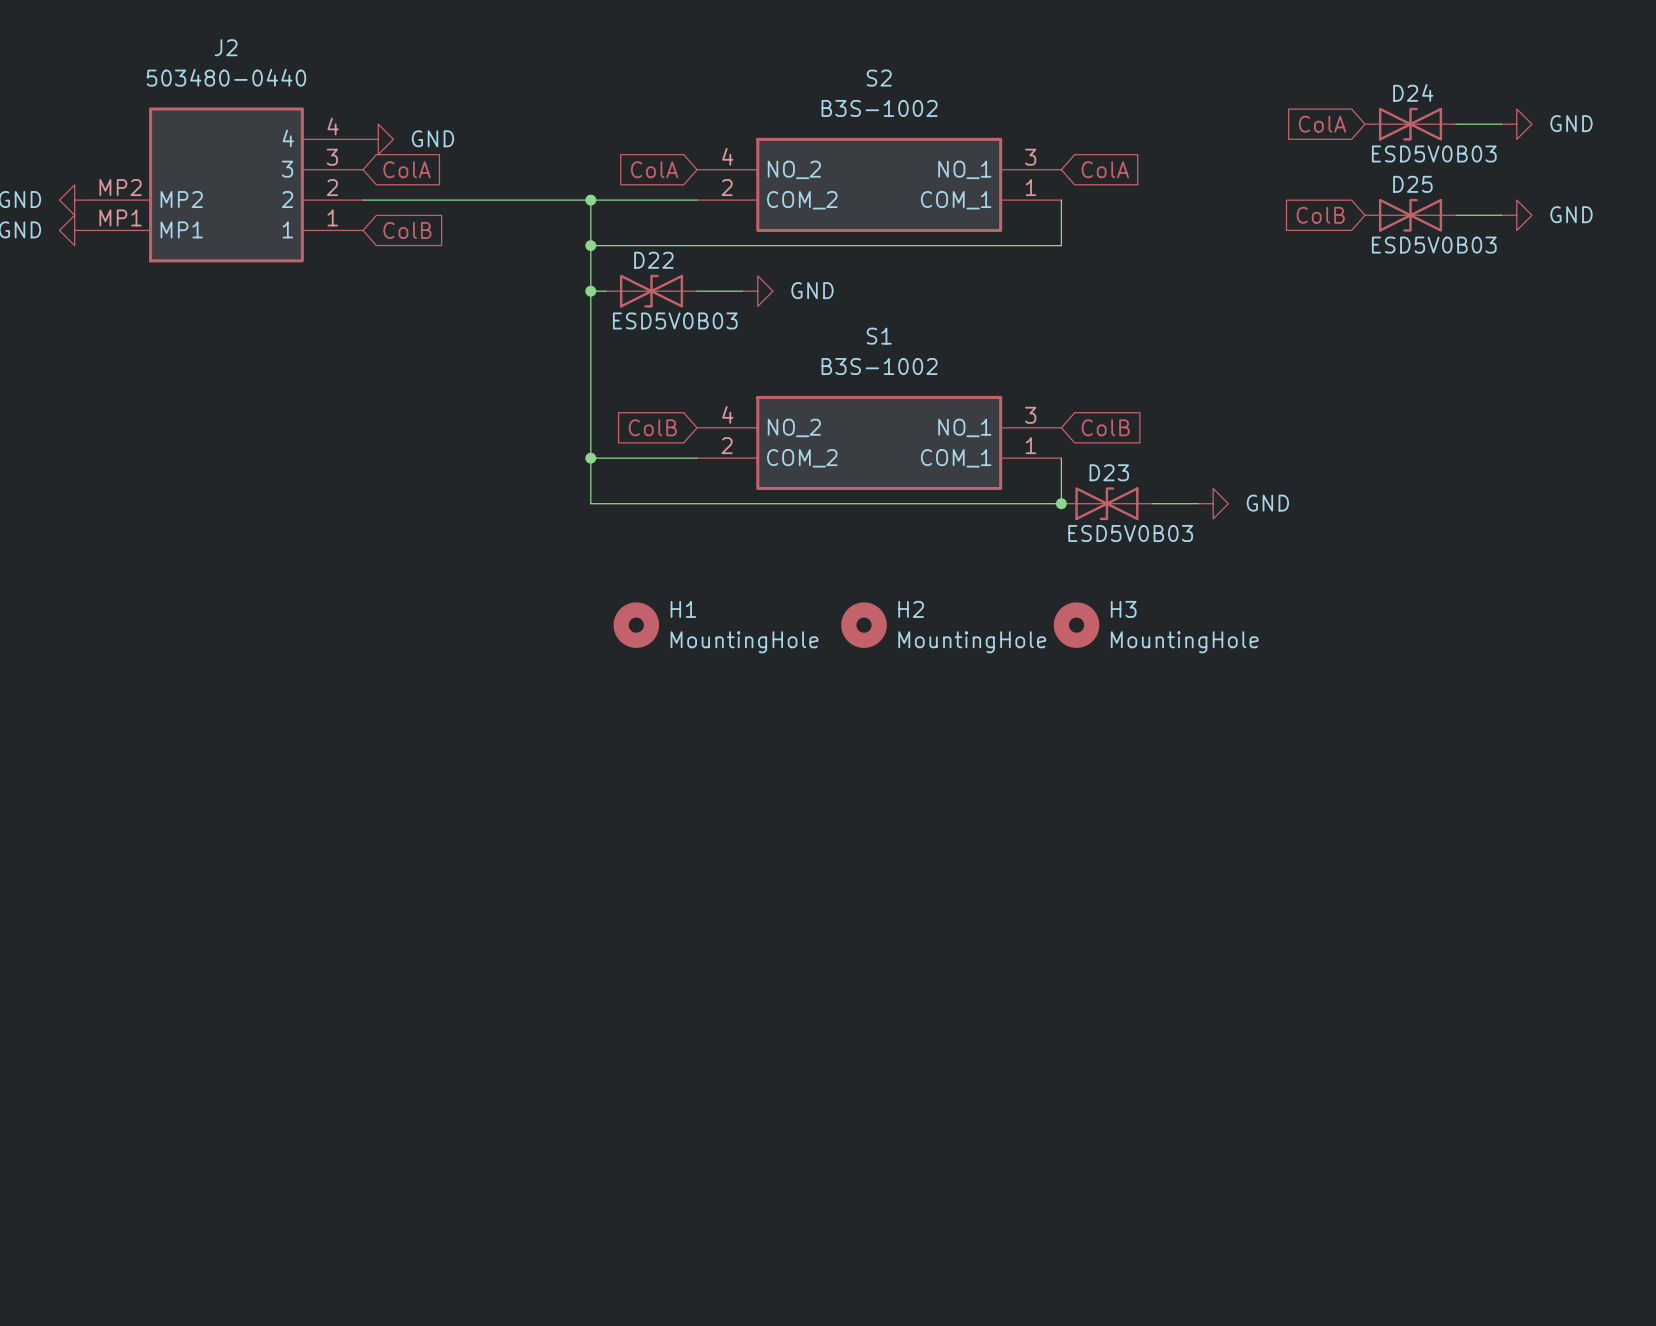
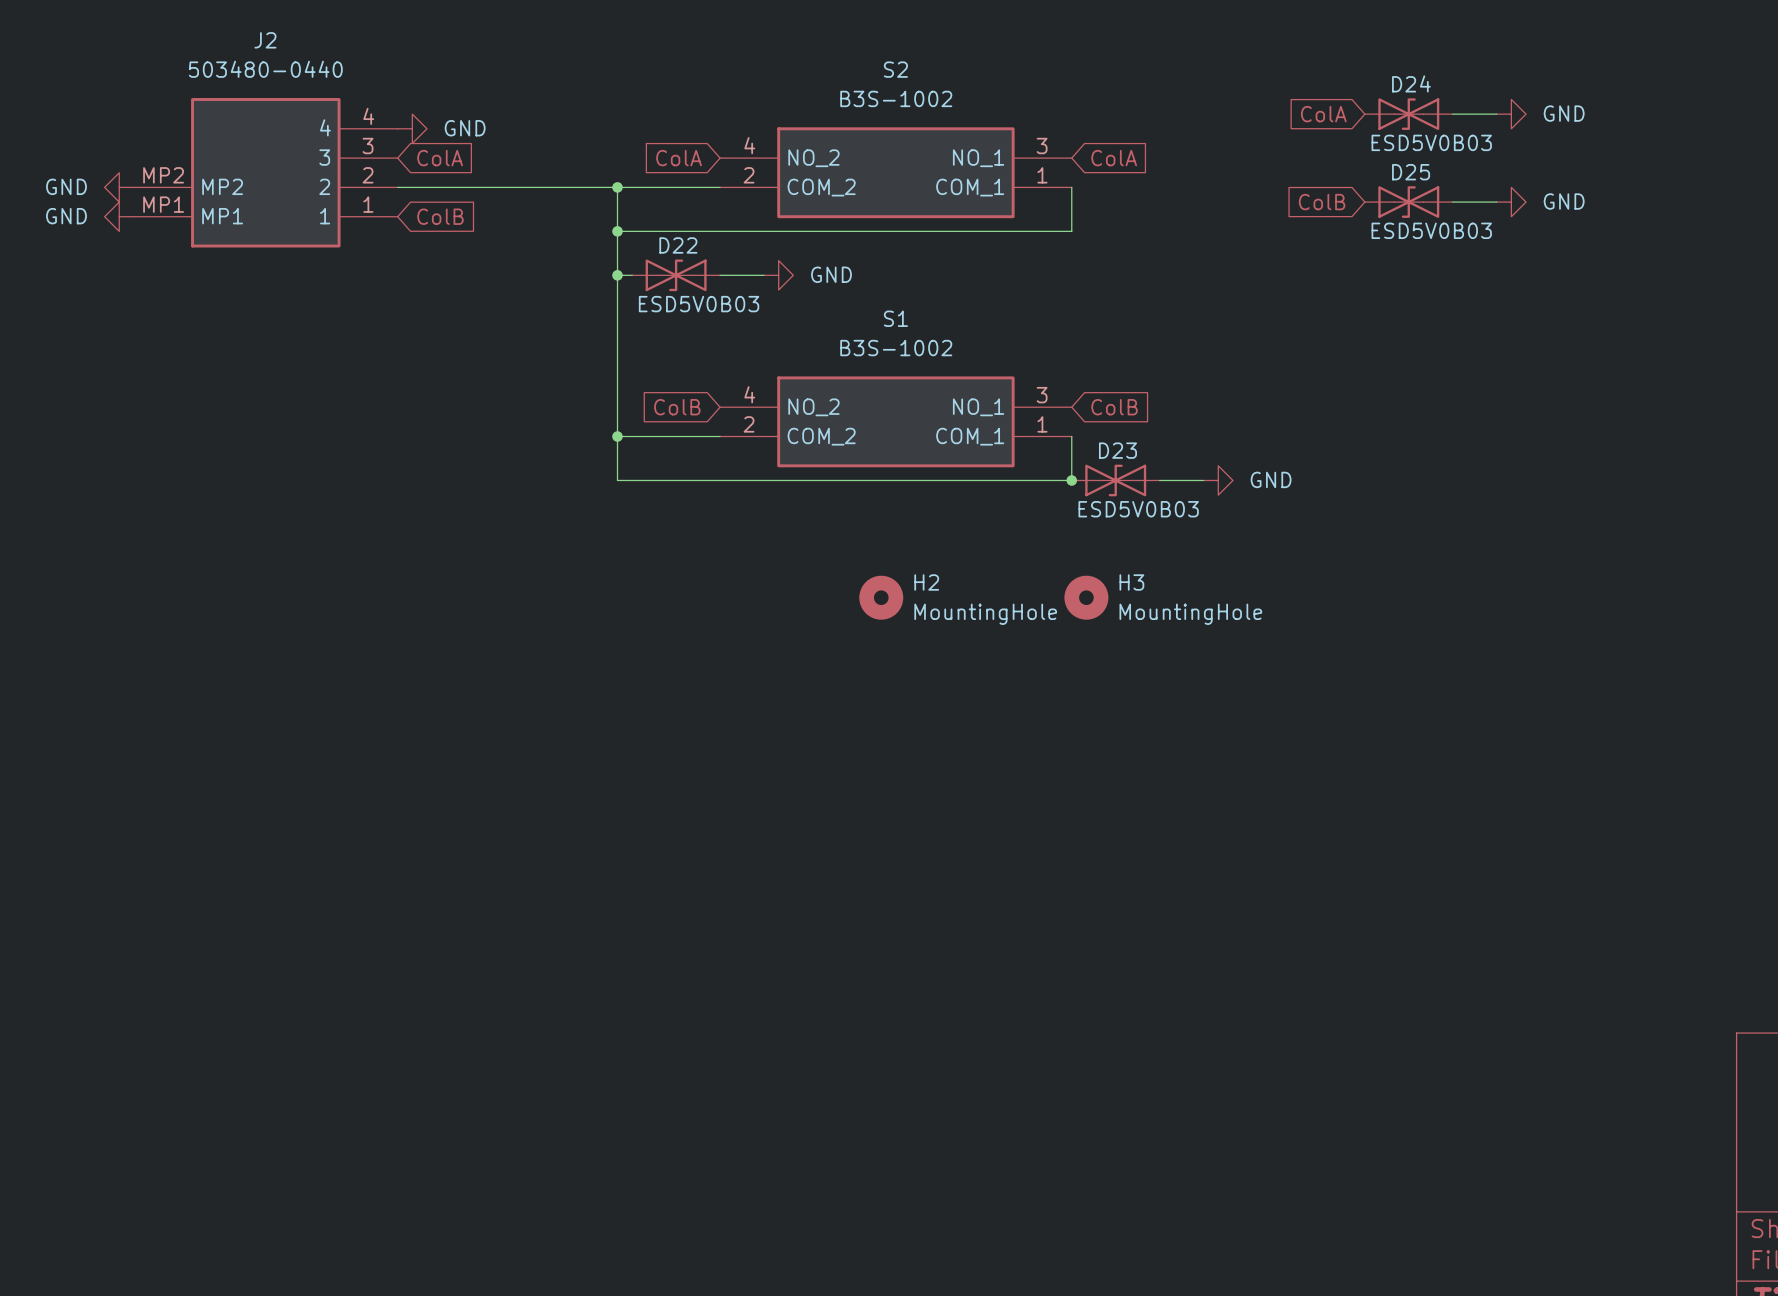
H1: MountingHole (636, 625) -> none

